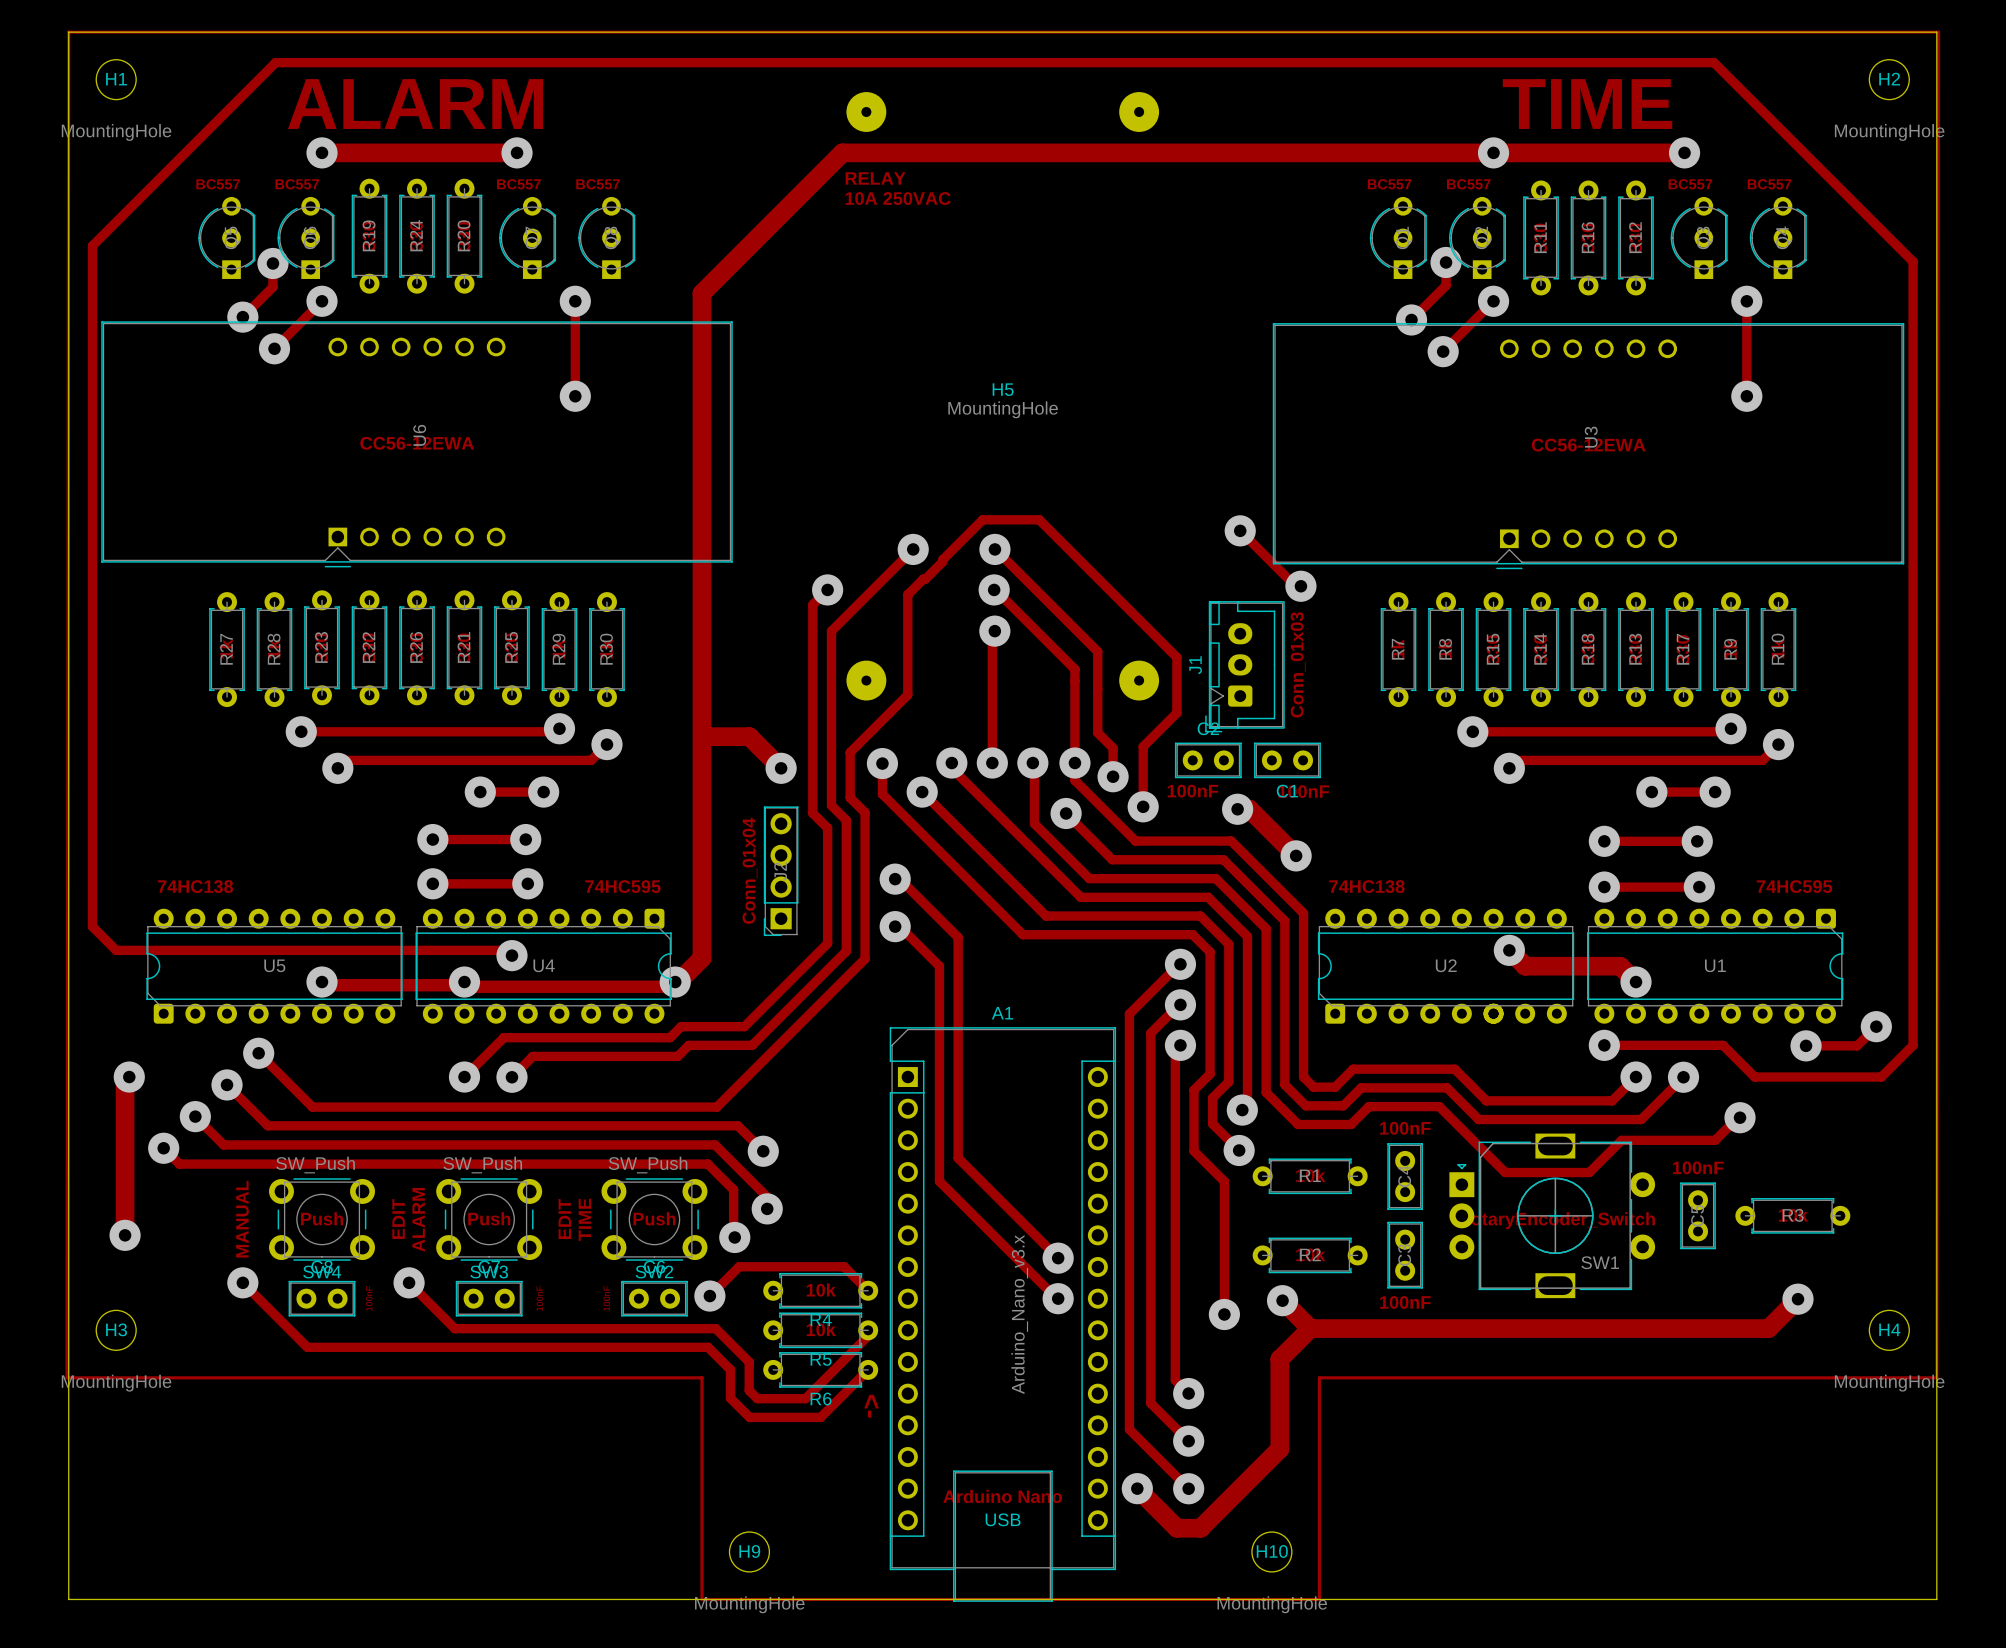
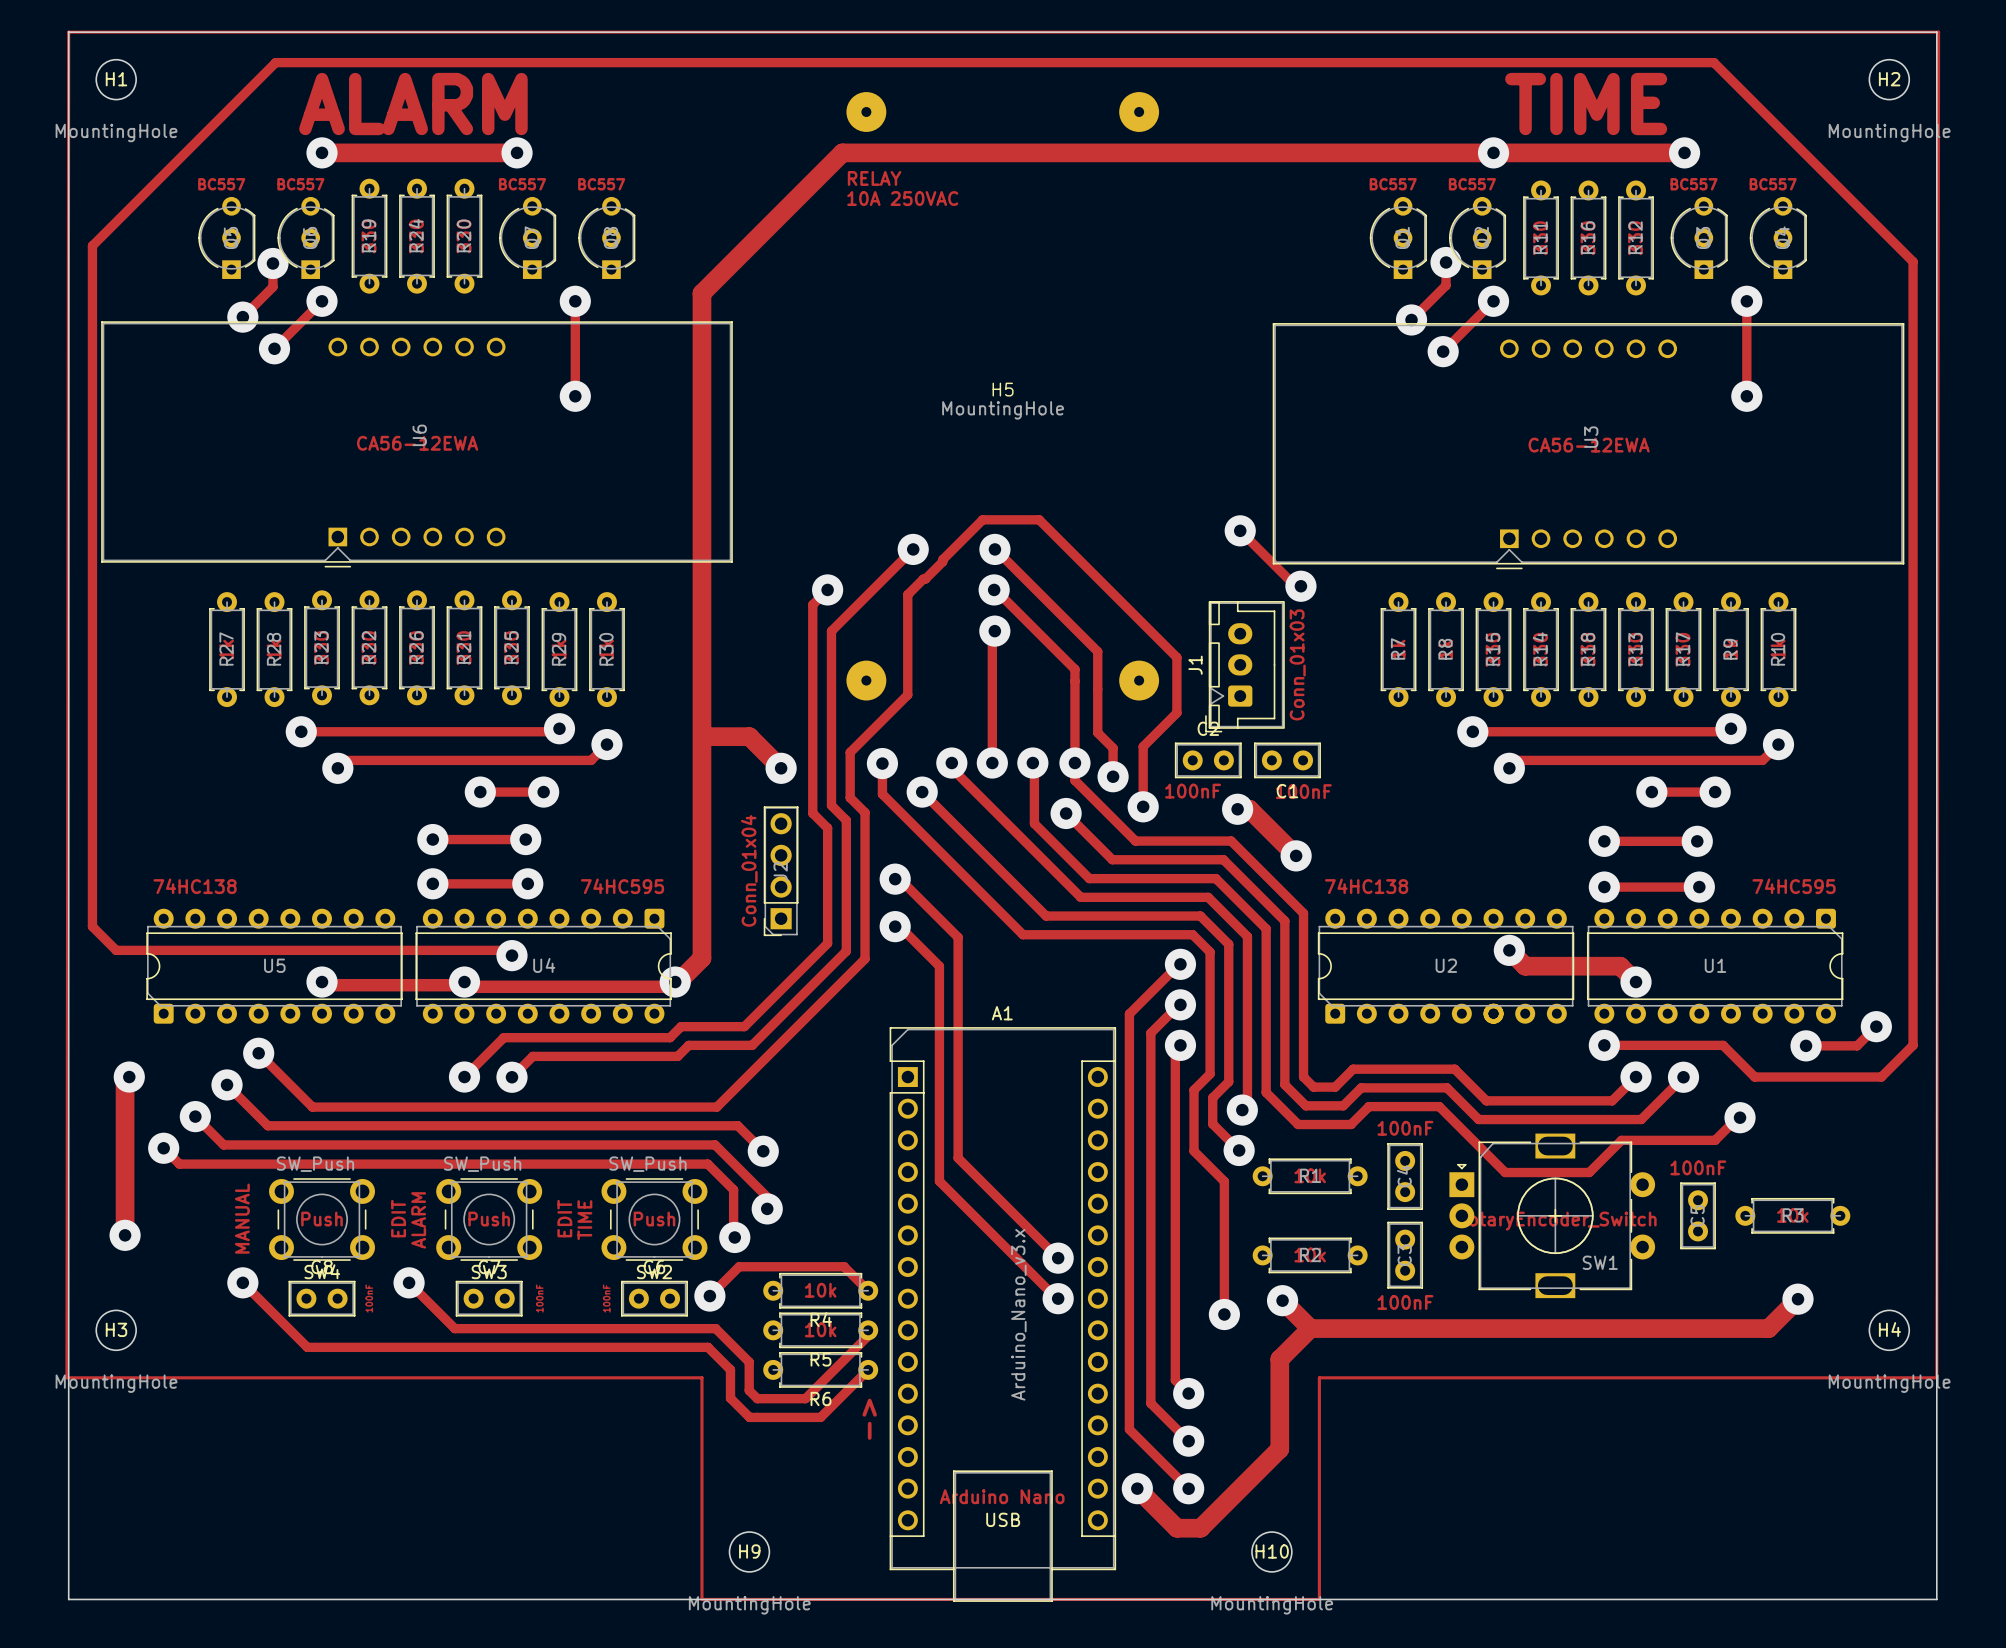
U6 value: CC56-12EWA (417, 443) -> CA56-12EWA (417, 443)
U3 value: CC56-12EWA (1588, 445) -> CA56-12EWA (1589, 445)

